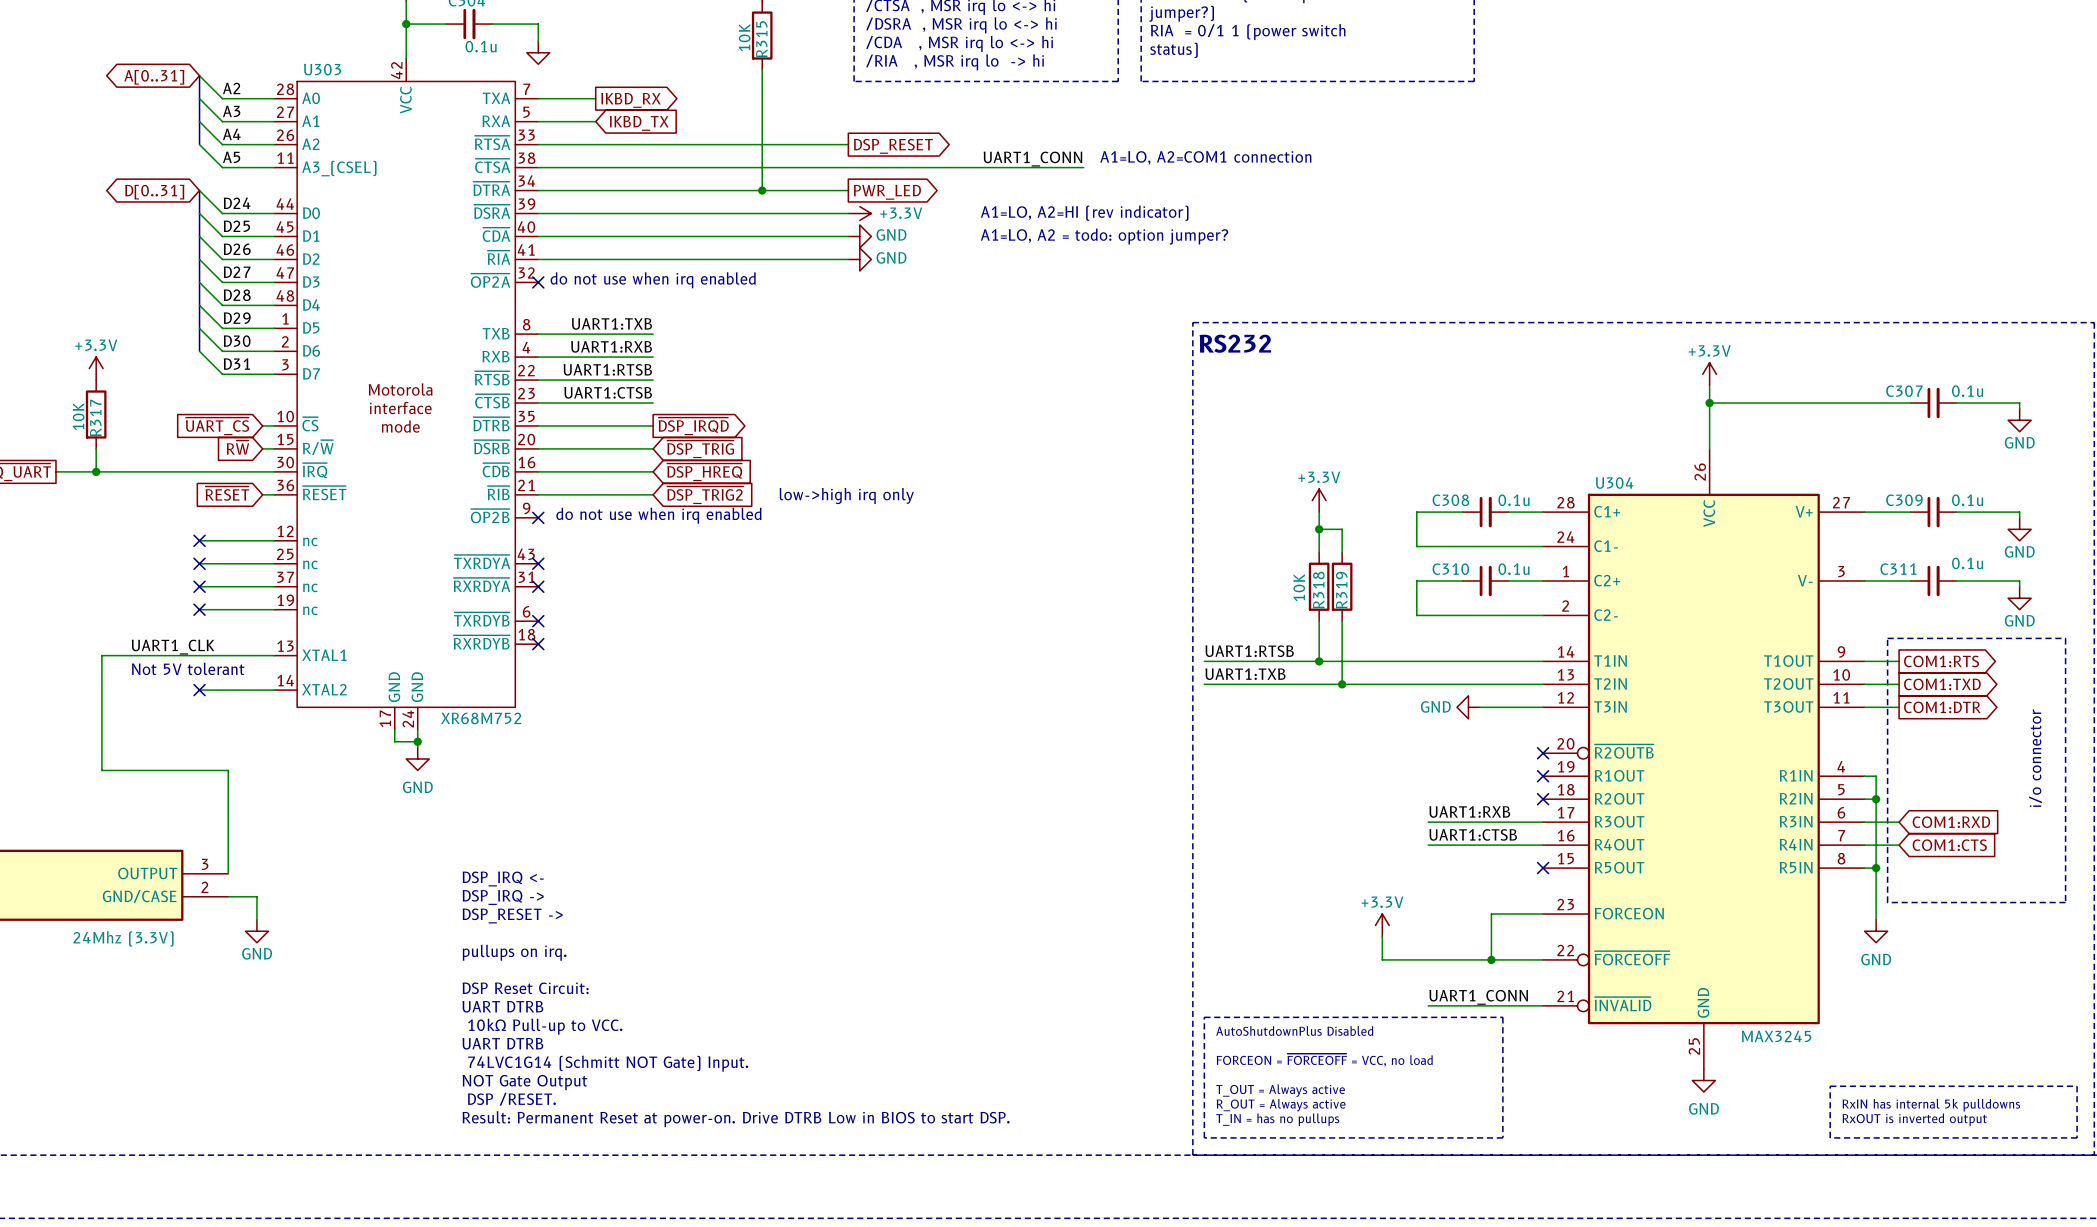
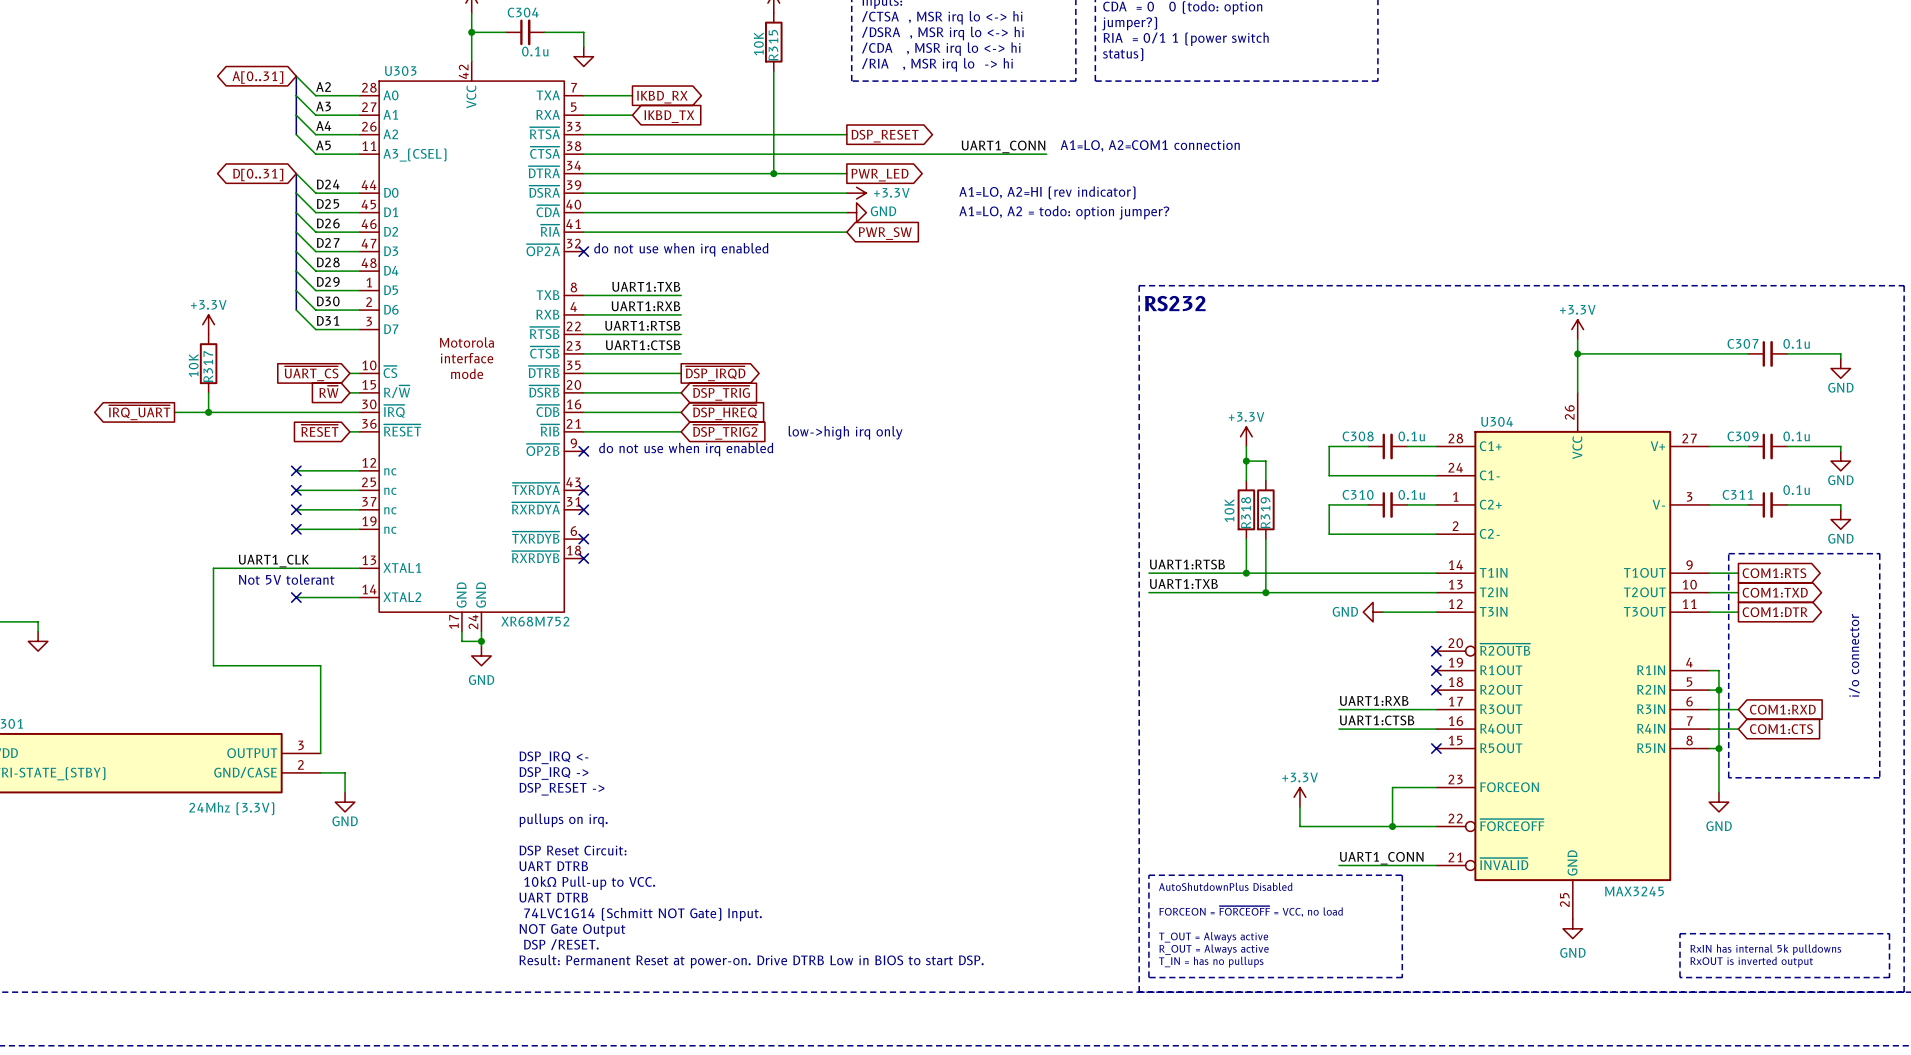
power symbol: GND (859, 259) -> none
global label: none -> PWR_SW (885, 233)

